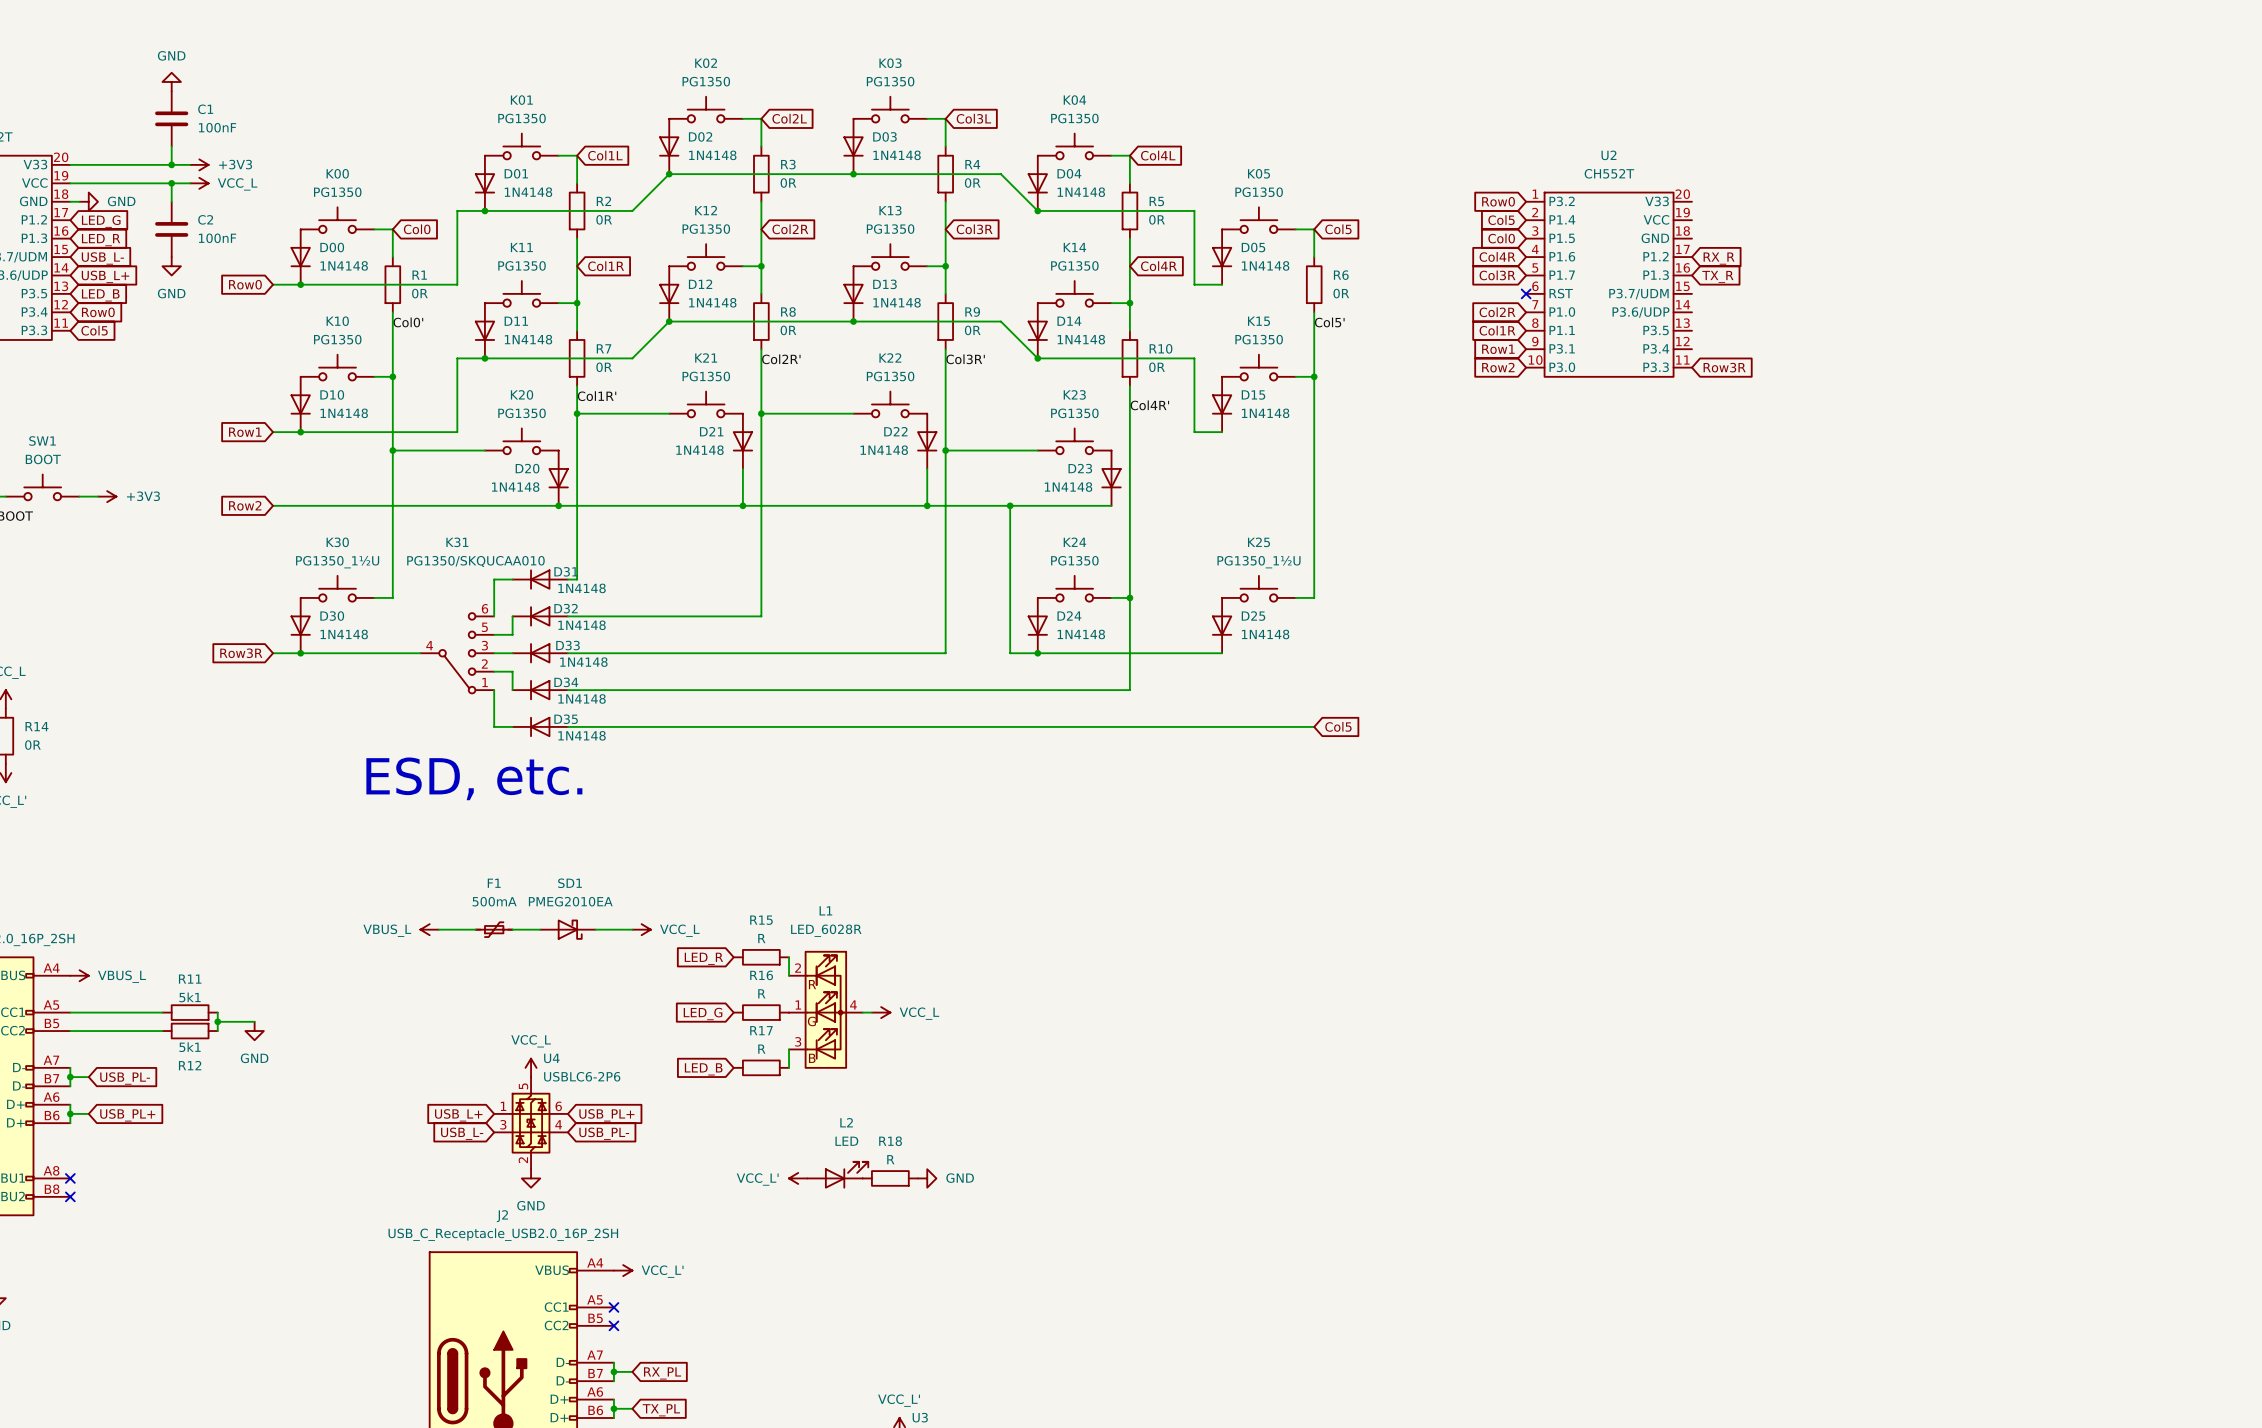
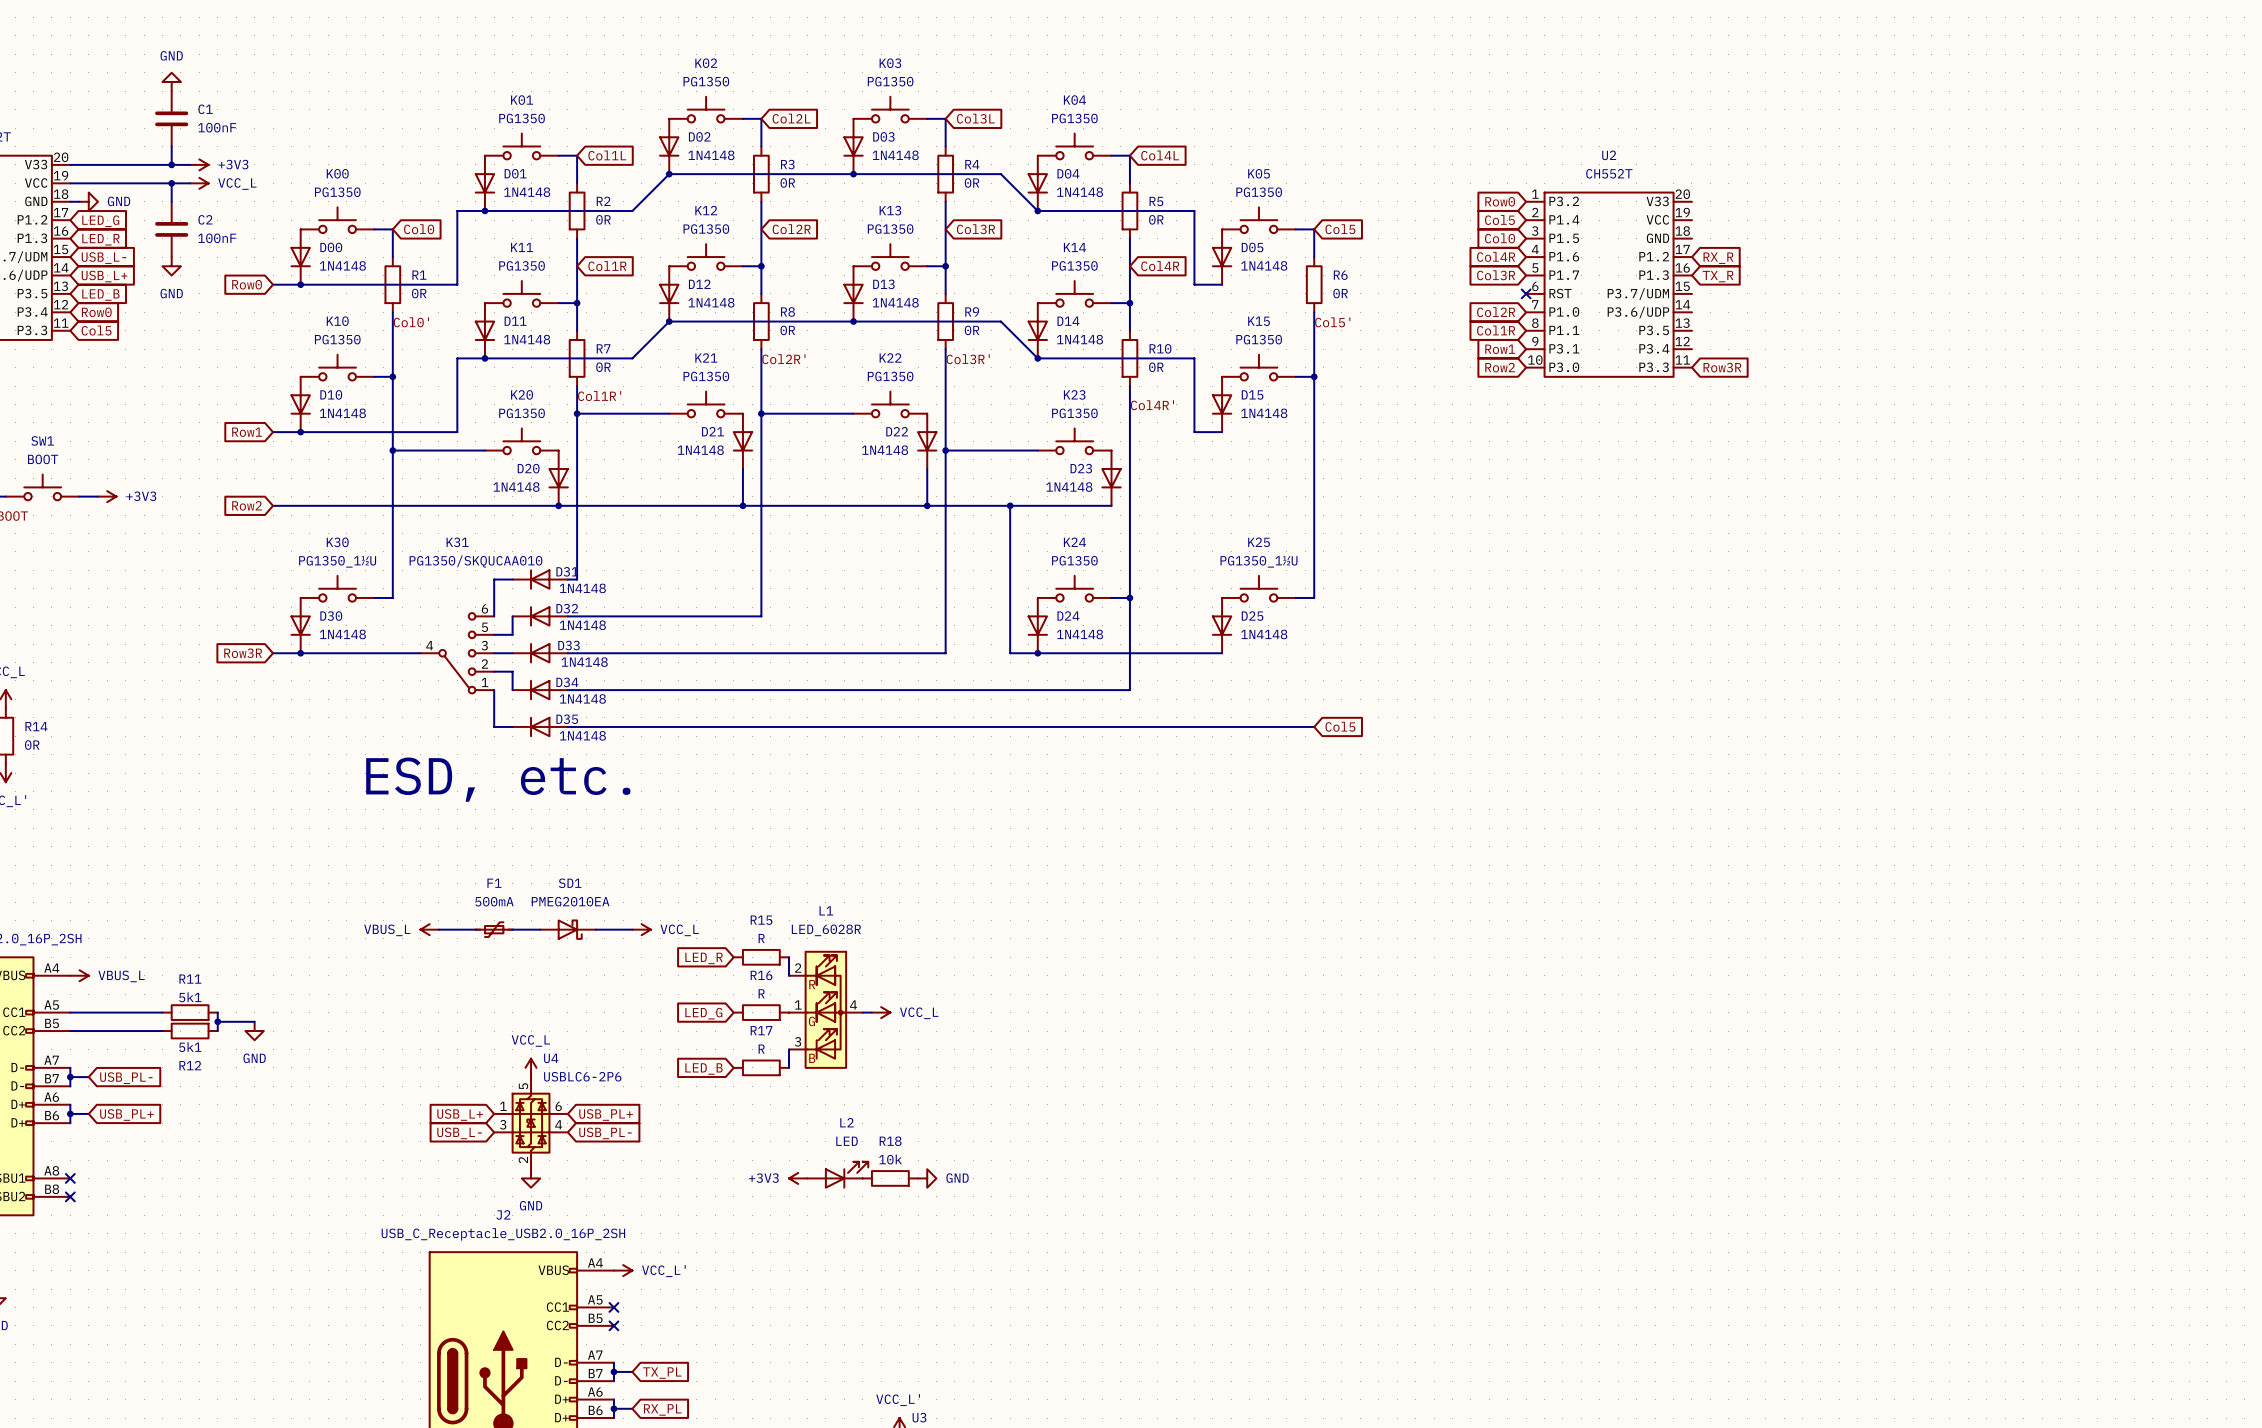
R18 value: R (890, 1159) -> 10k (890, 1159)
power symbol: VCC_L' (798, 1178) -> +3V3 (798, 1178)
global label: RX_PL (662, 1373) -> TX_PL (662, 1373)
global label: TX_PL (661, 1410) -> RX_PL (662, 1409)

